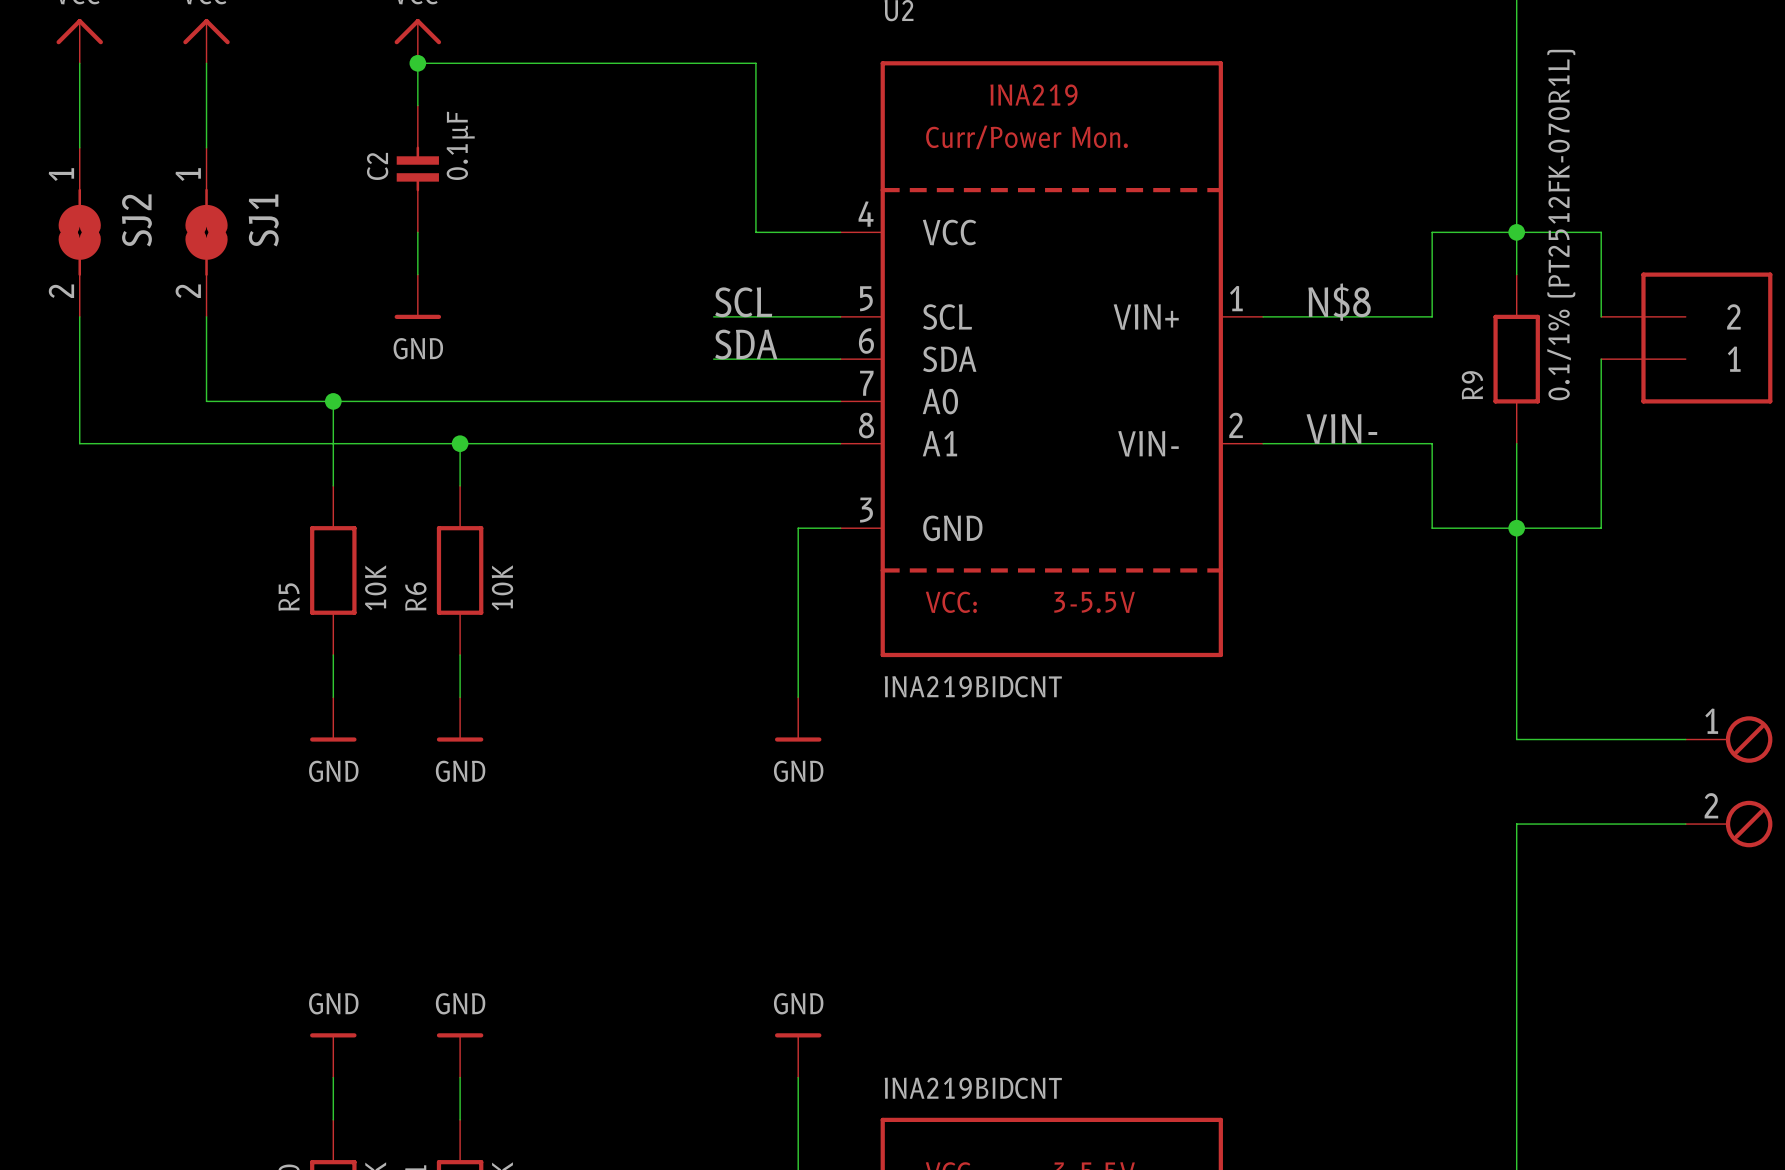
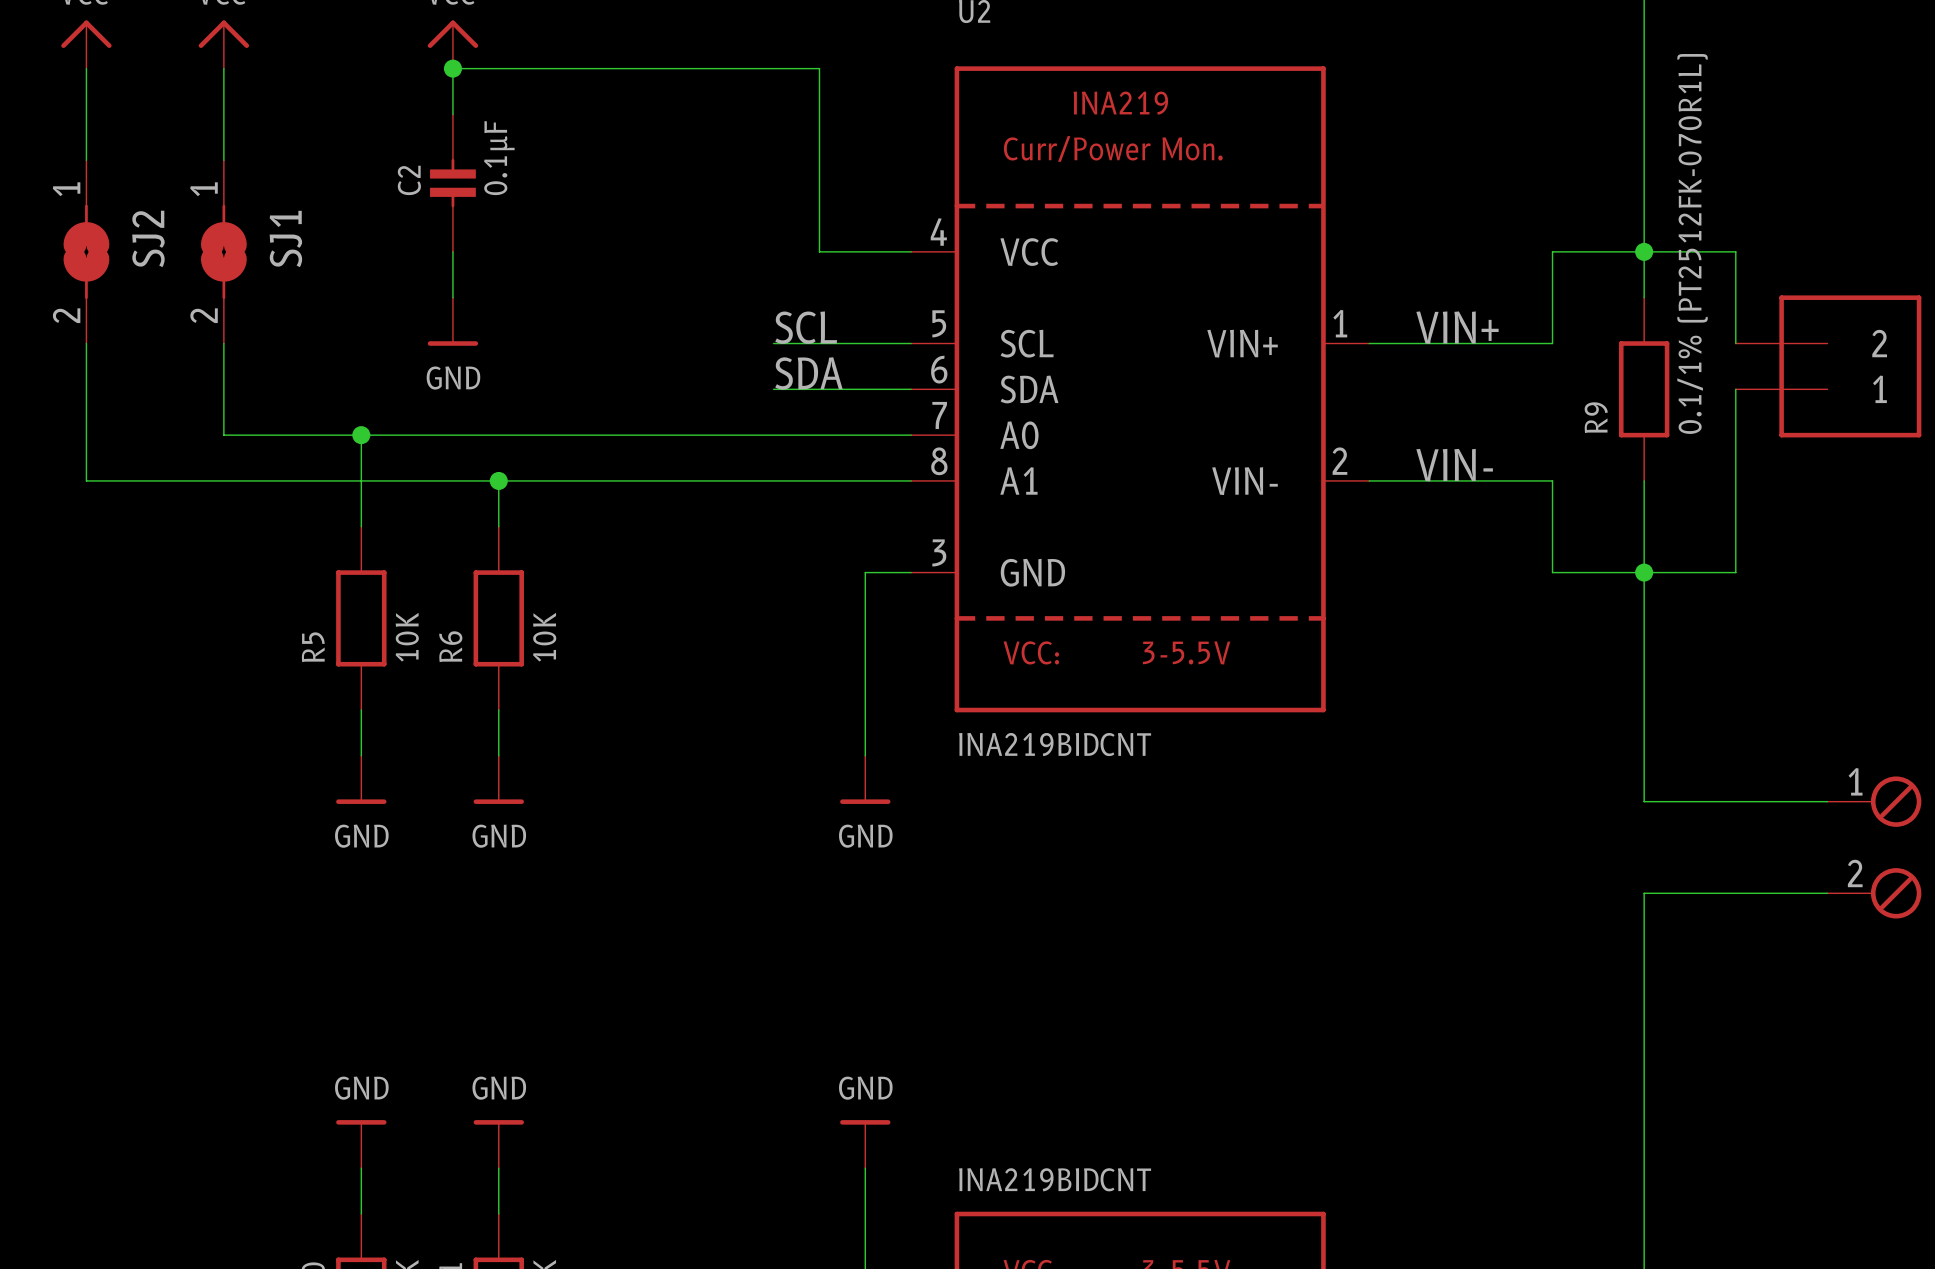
label: N$8 (1339, 302) -> VIN+ (1457, 327)

